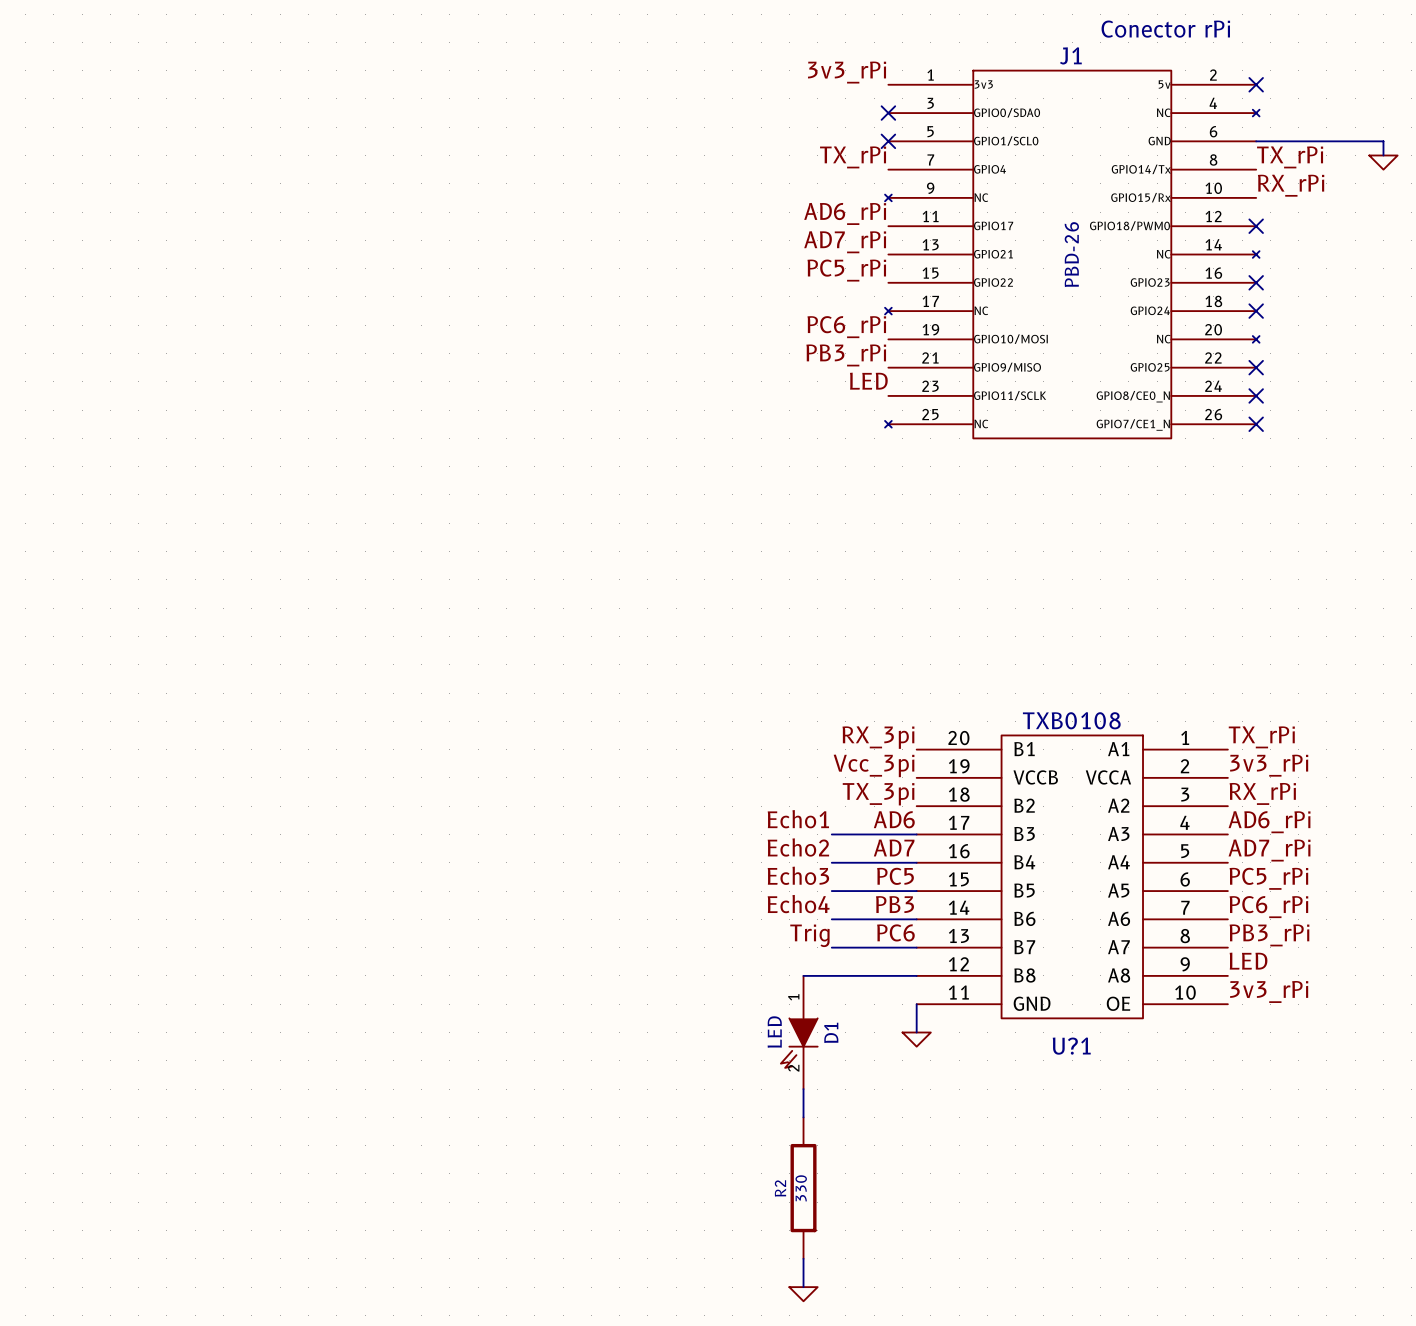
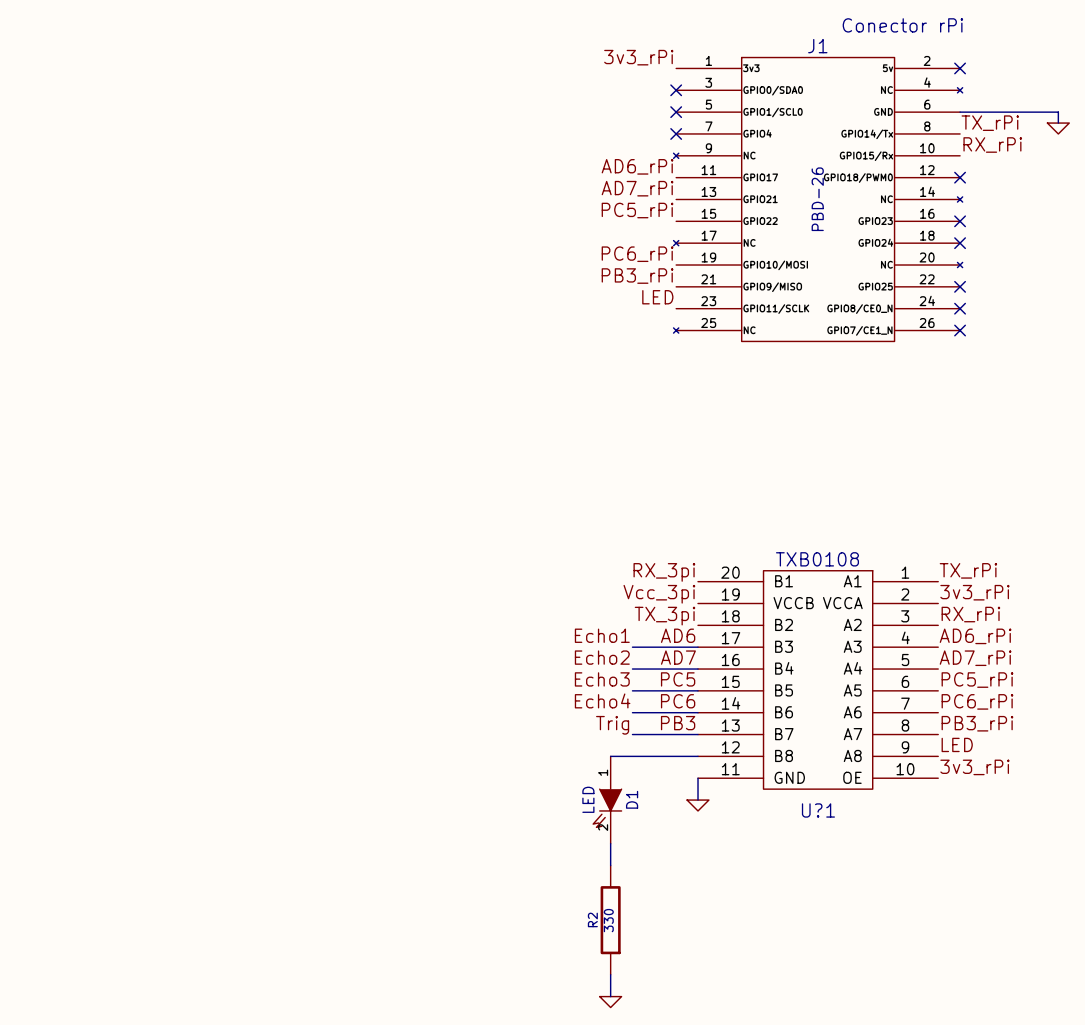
label: TX_rPi (853, 157) -> none
no-connect mark: none -> (676, 133)
label: PB3 (894, 904) -> PC6 (678, 701)
label: PC6 (895, 932) -> PB3 (678, 723)

